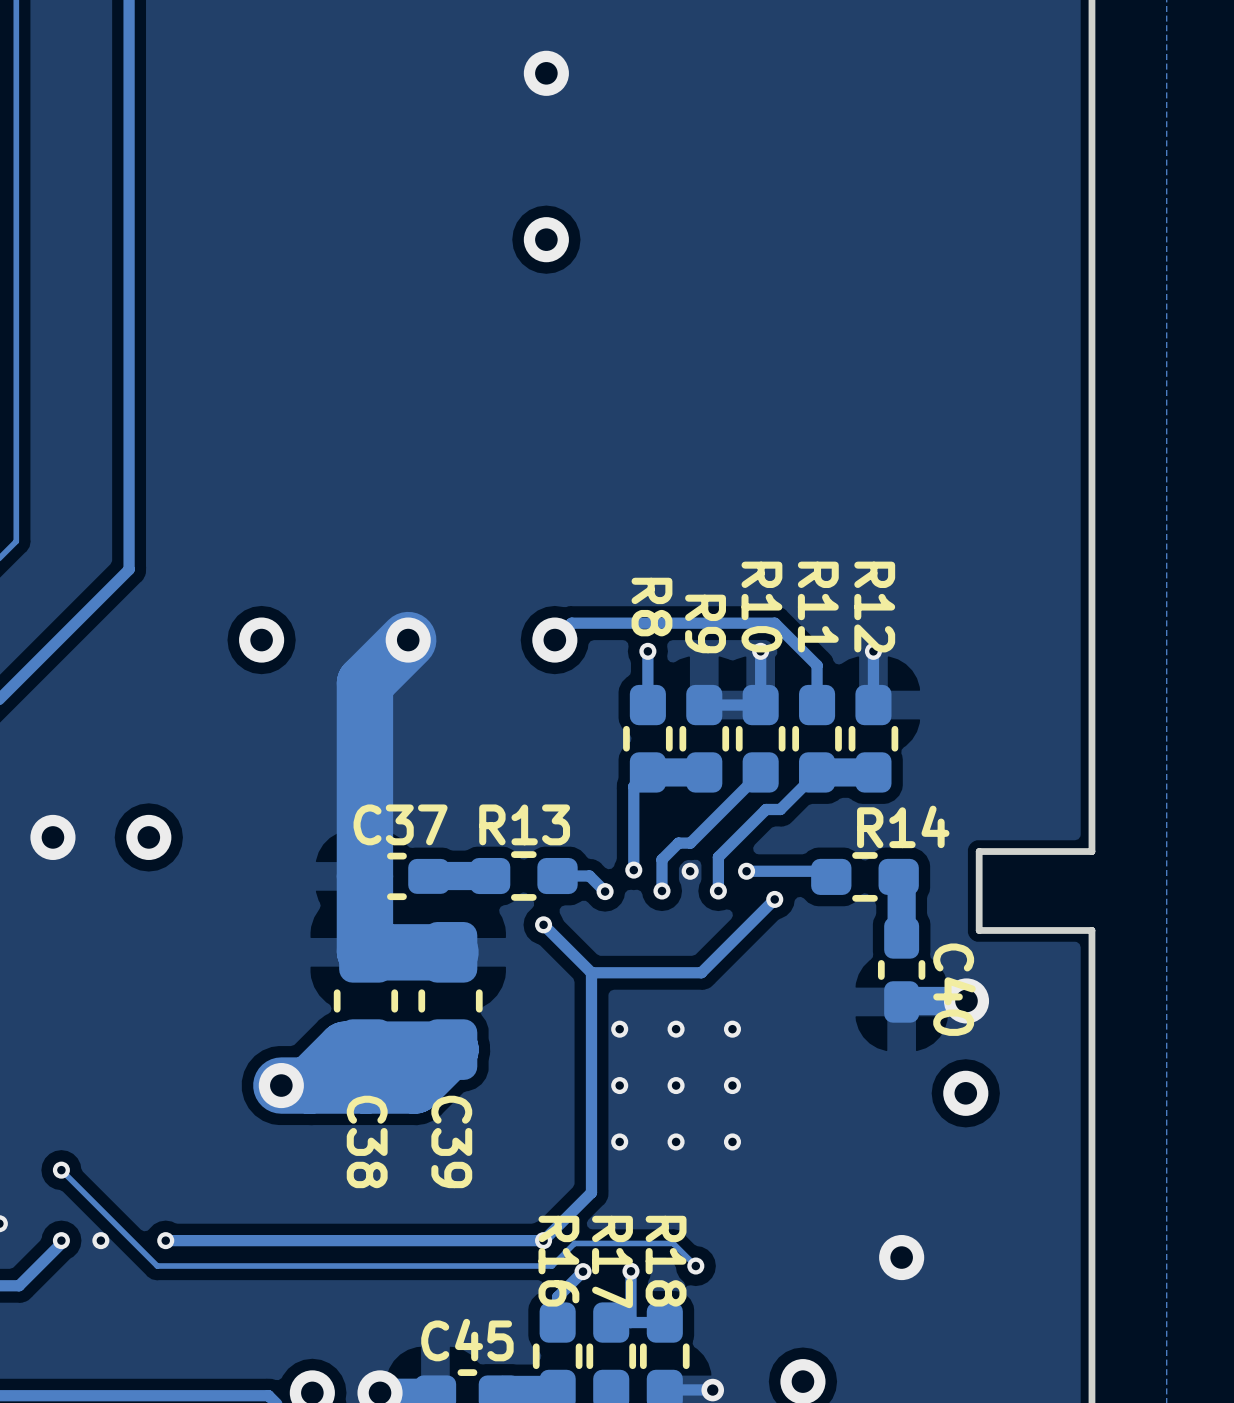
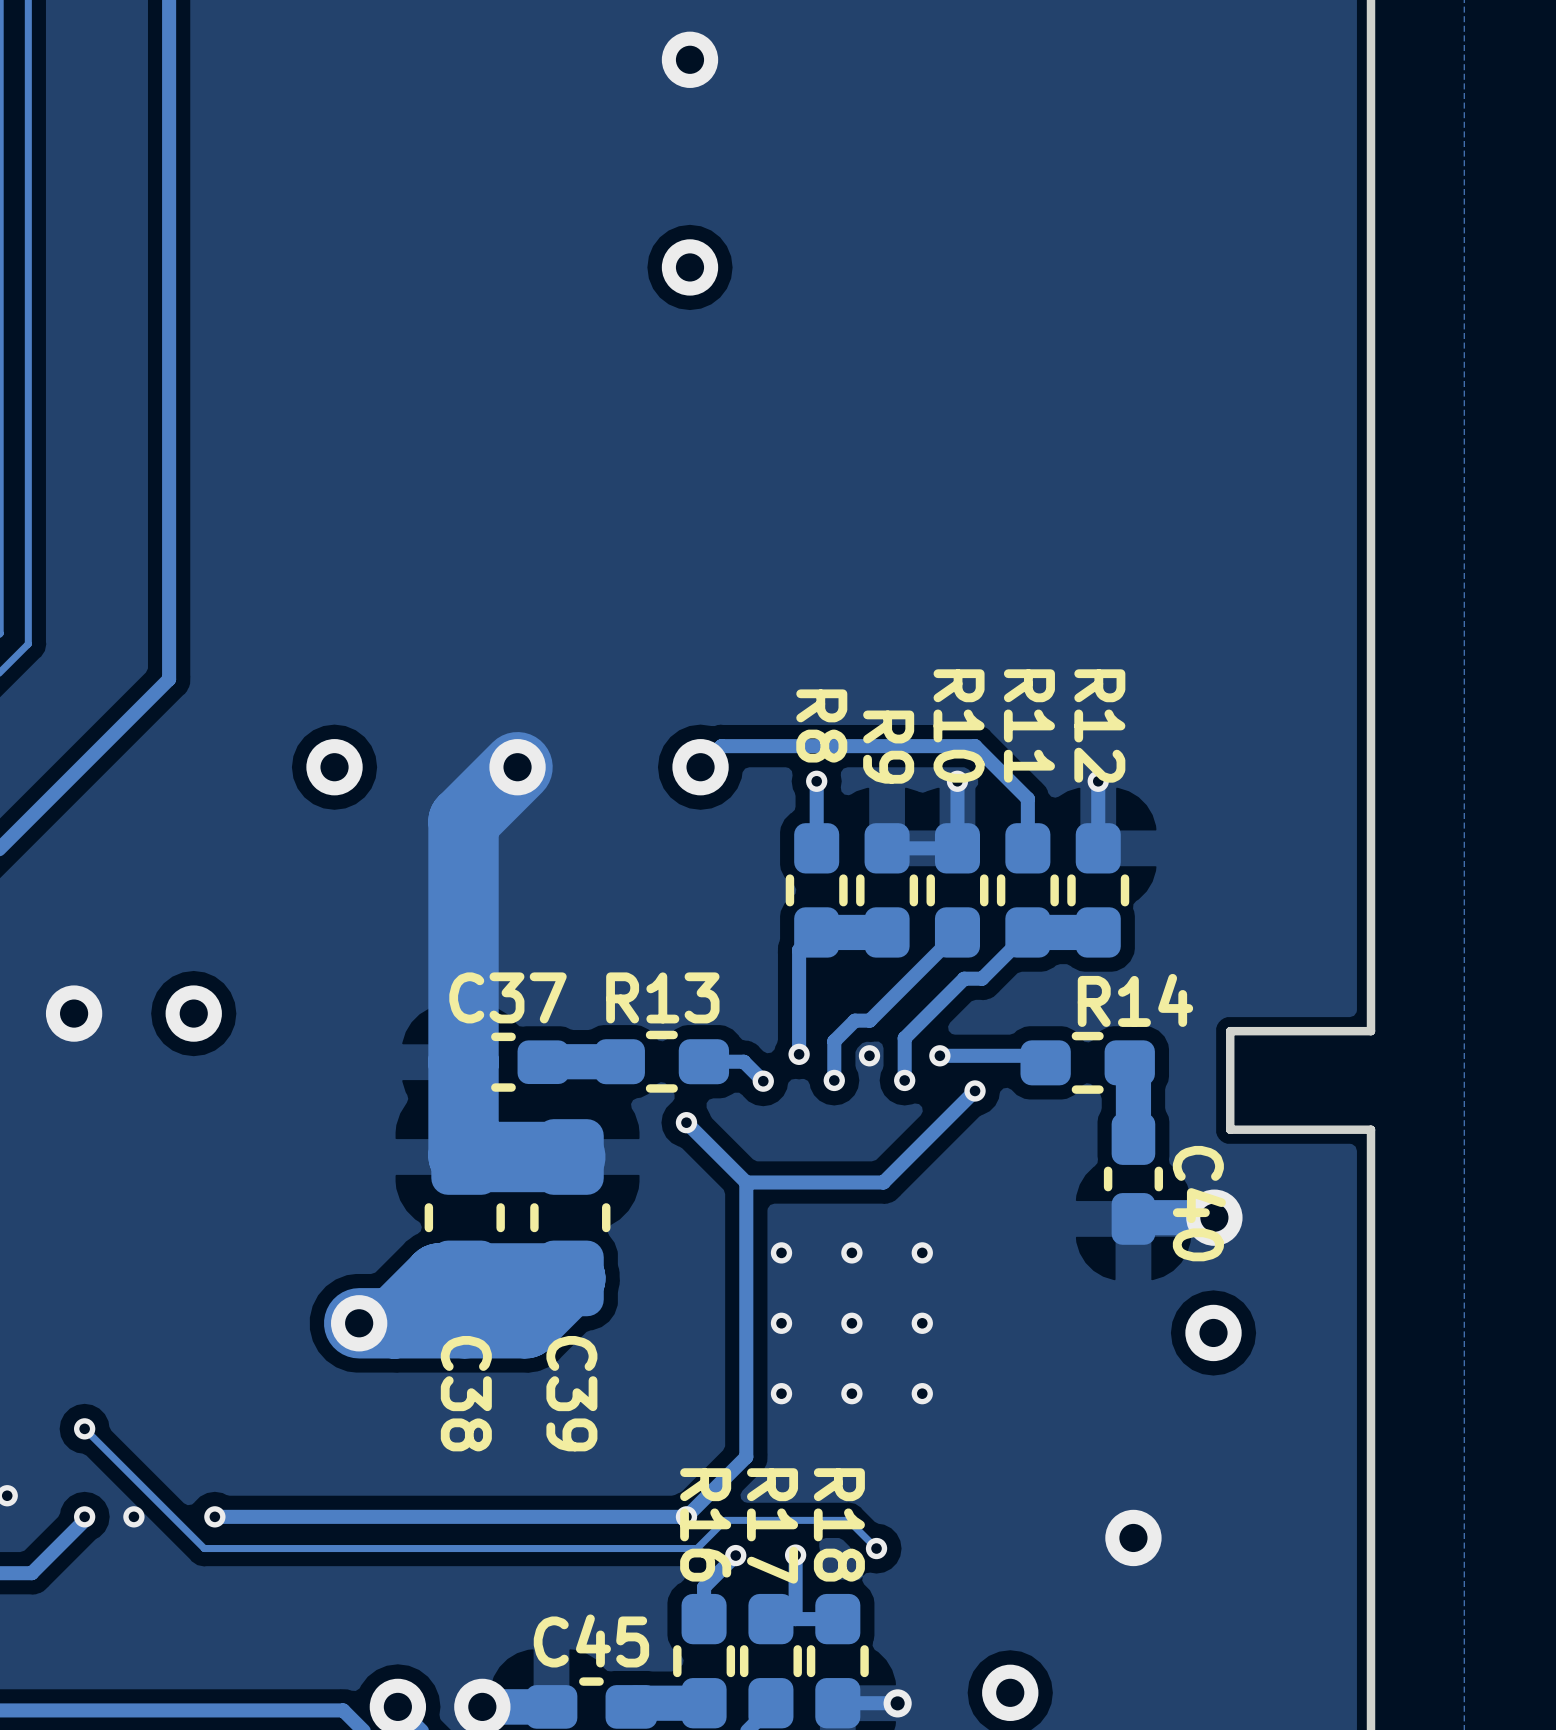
R16 name position: R16 (558, 1261) -> R16 (705, 1524)
R17 name position: R17 (612, 1261) -> R17 (772, 1525)
R18 name position: R18 (666, 1261) -> R18 (839, 1524)

